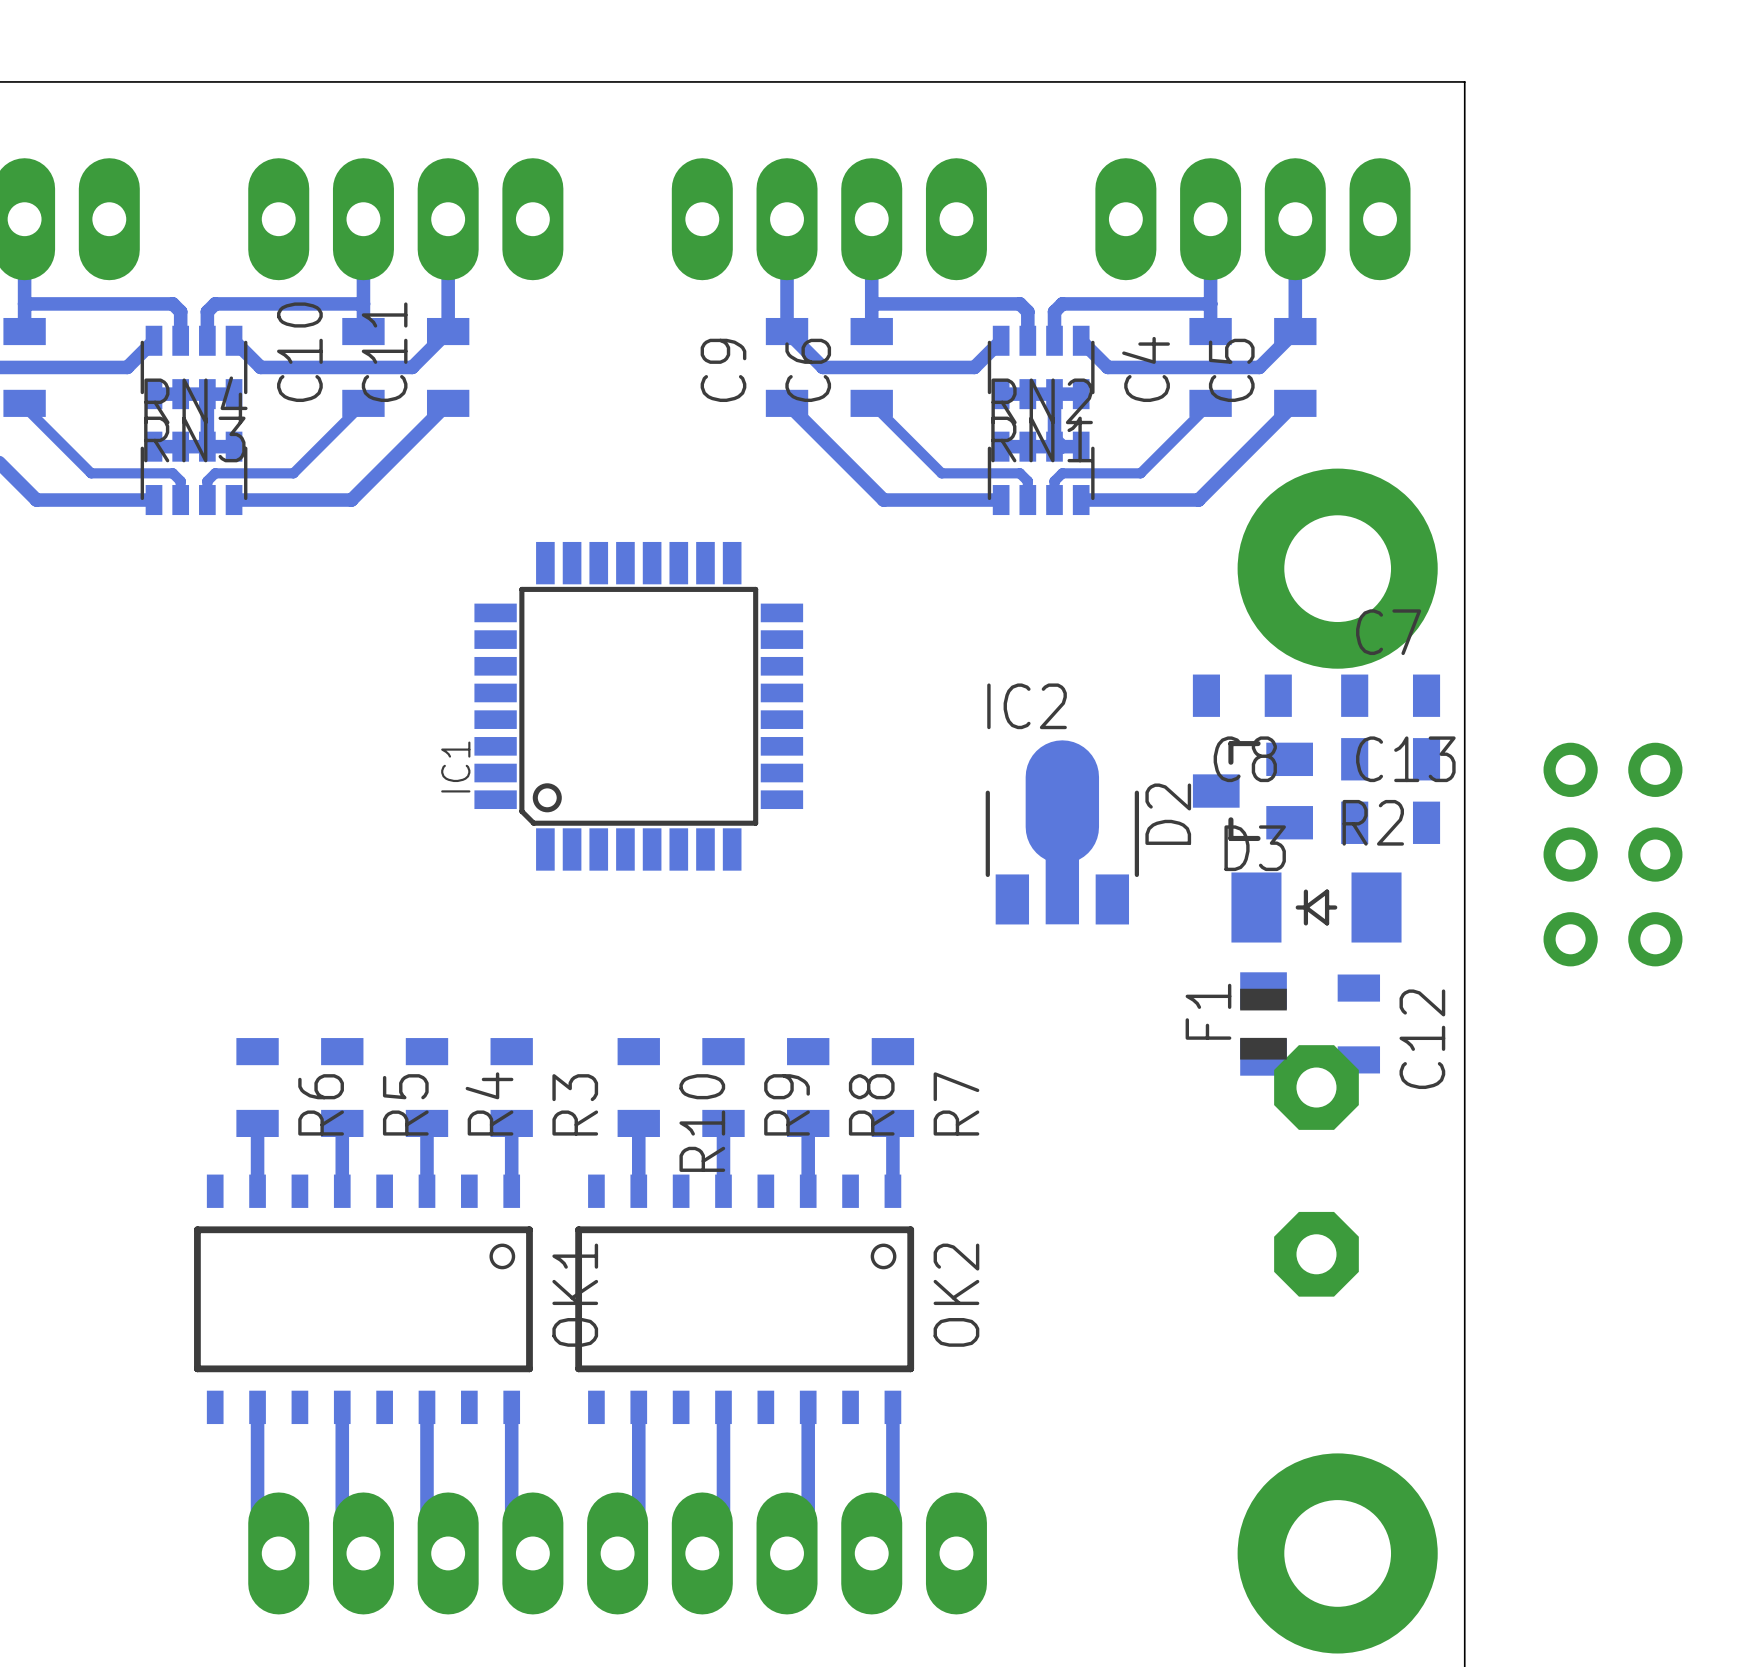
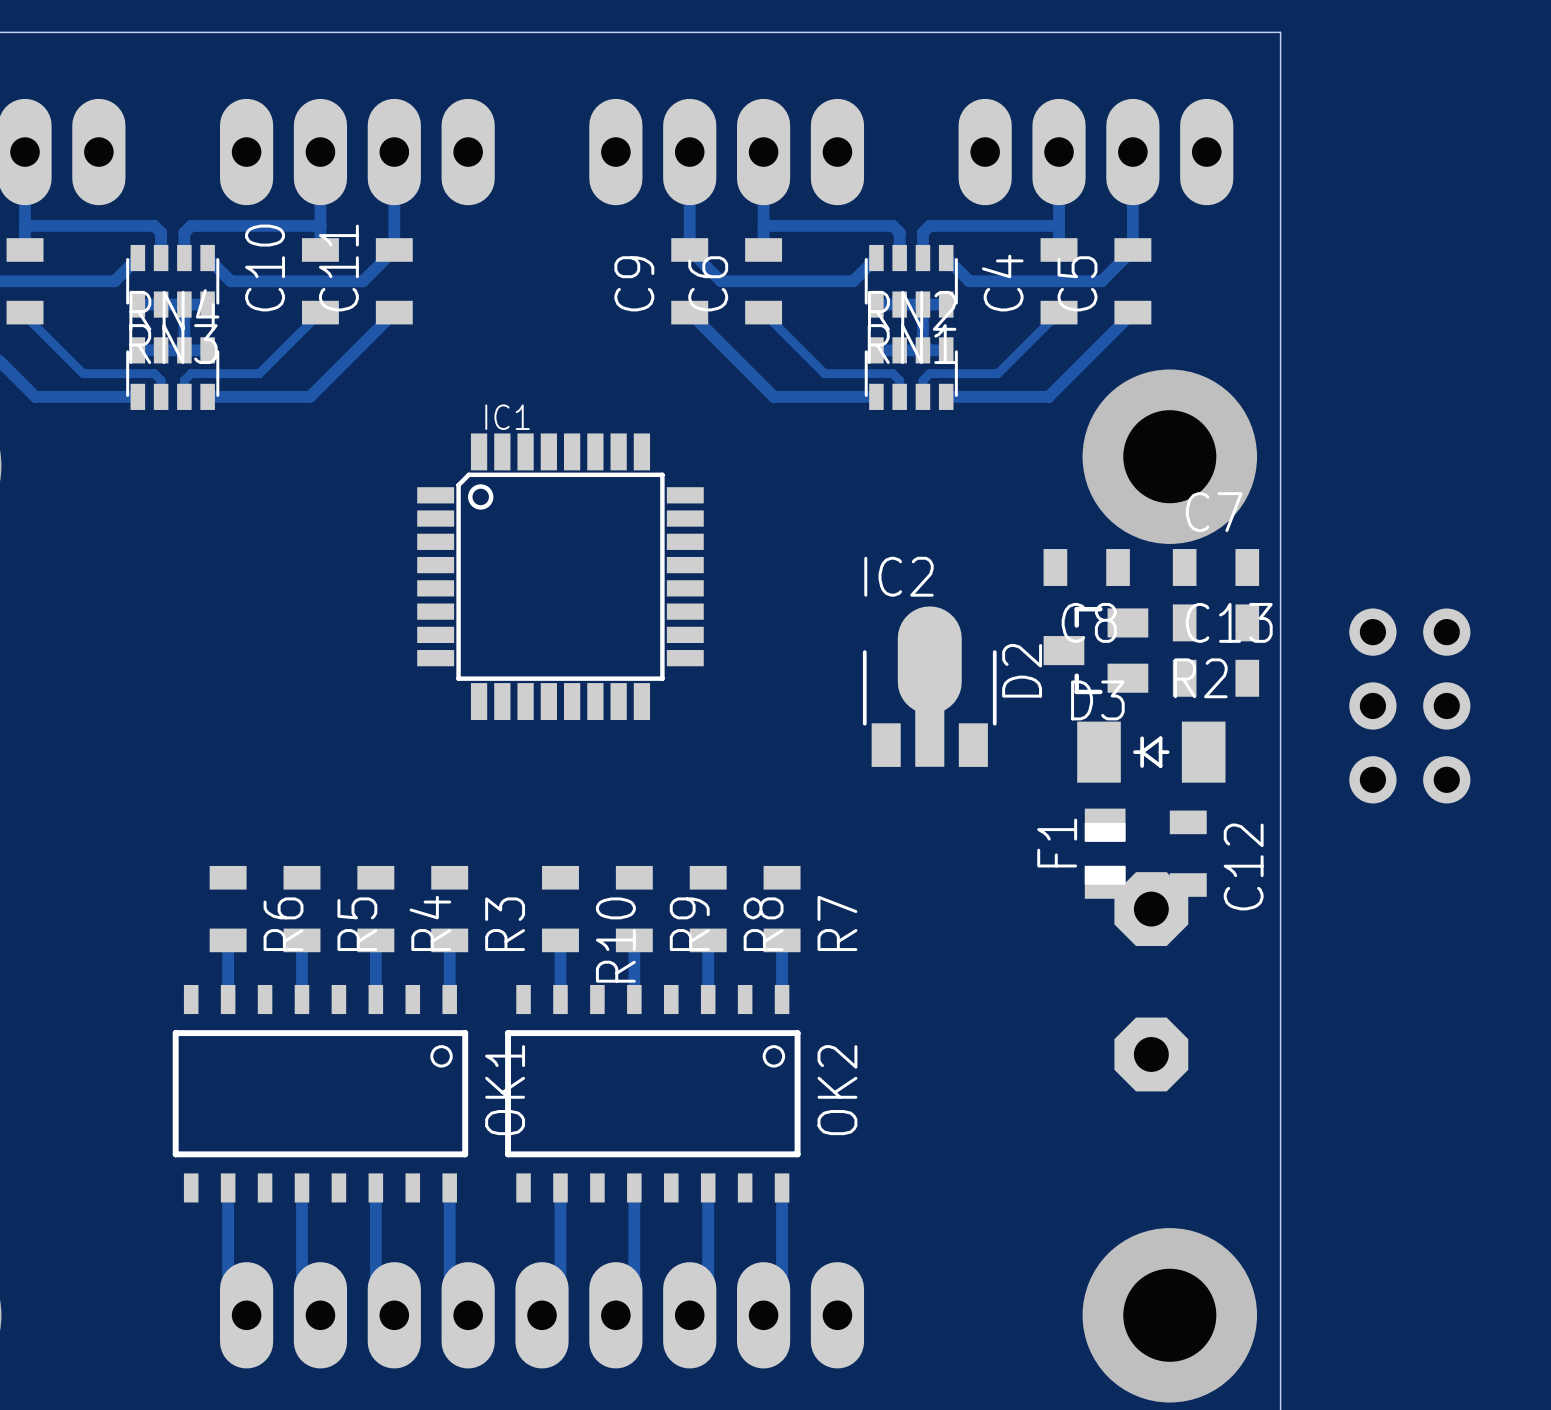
IC1 rotation: 0° (638, 706) -> 90° clockwise (560, 576)

